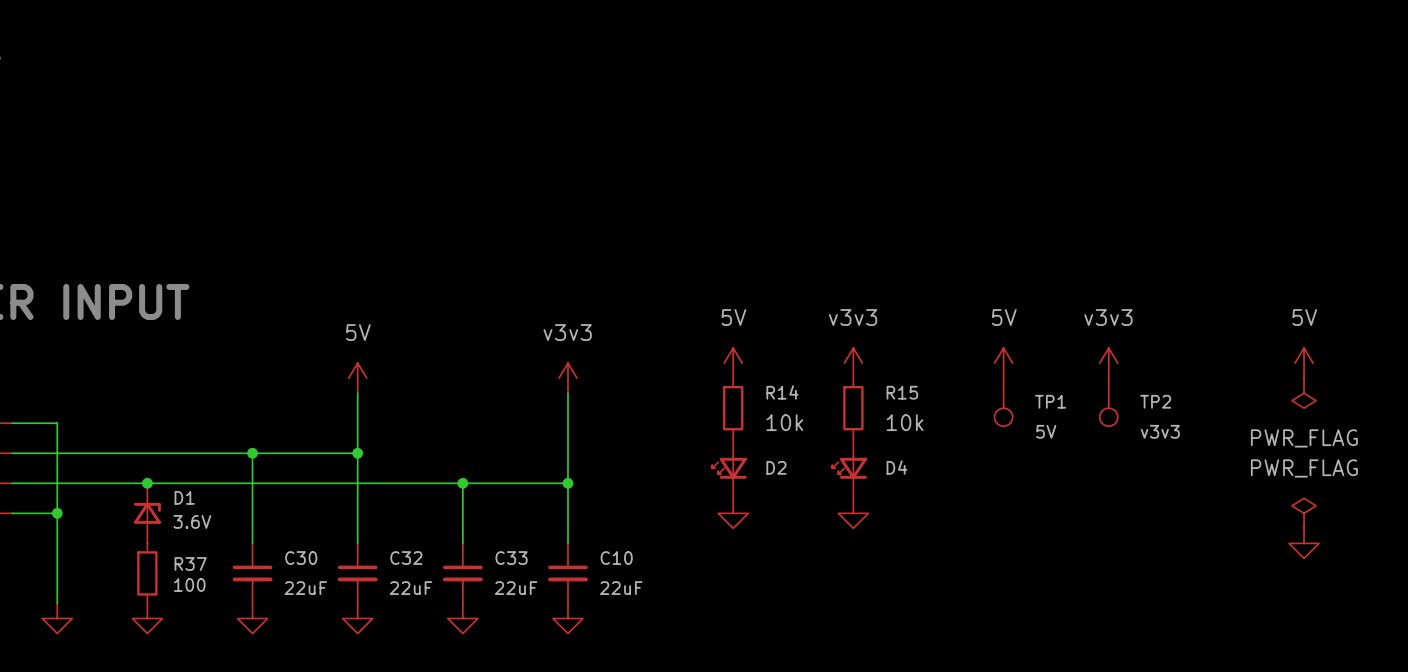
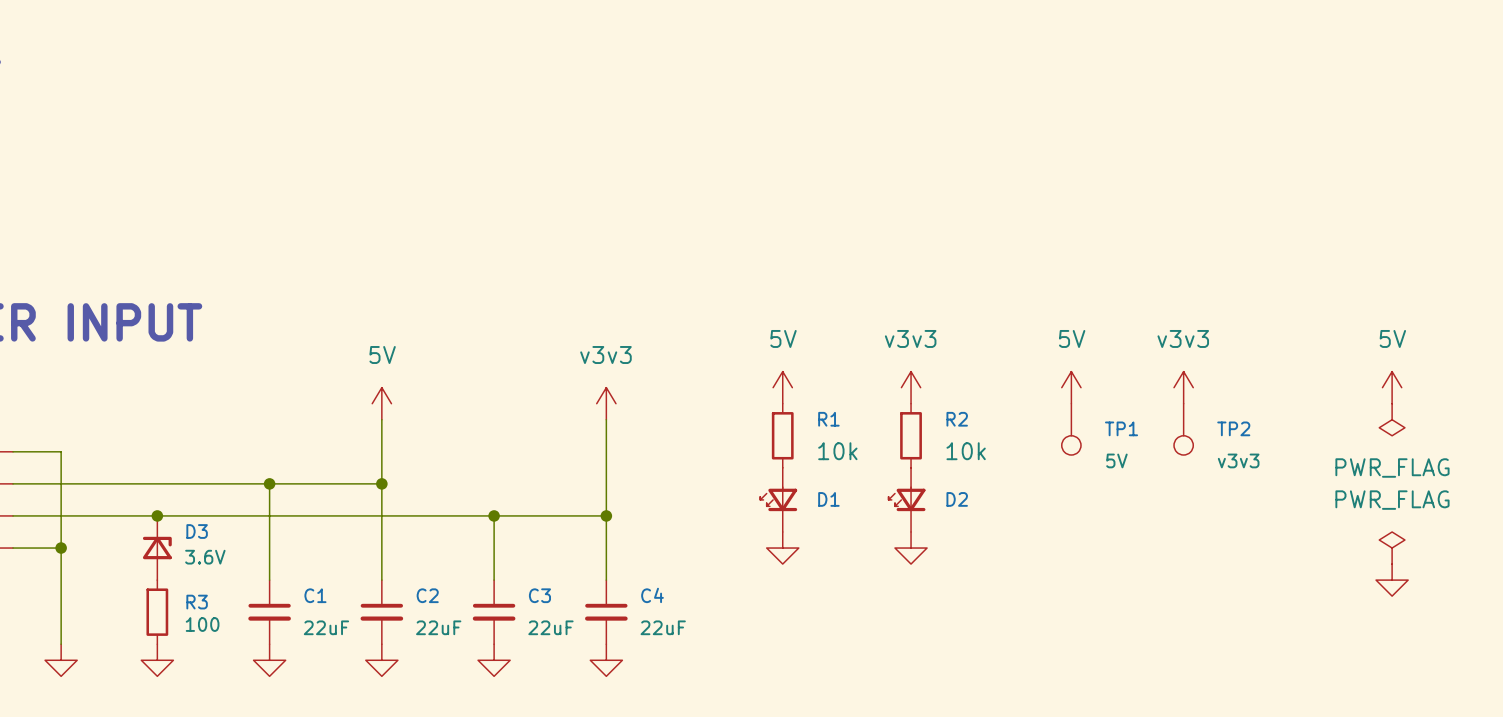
R14 name: R14 (782, 392) -> R1 (828, 419)
R15 name: R15 (902, 392) -> R2 (957, 419)
D2 name: D2 (776, 467) -> D1 (828, 499)
D4 name: D4 (896, 467) -> D2 (957, 499)
D1 name: D1 (184, 497) -> D3 (197, 531)
C30 name: C30 (301, 558) -> C1 (315, 595)
C32 name: C32 (406, 558) -> C2 (427, 595)
C33 name: C33 (511, 558) -> C3 (539, 595)
C10 name: C10 (616, 558) -> C4 (652, 595)
R37 name: R37 (190, 563) -> R3 (197, 602)

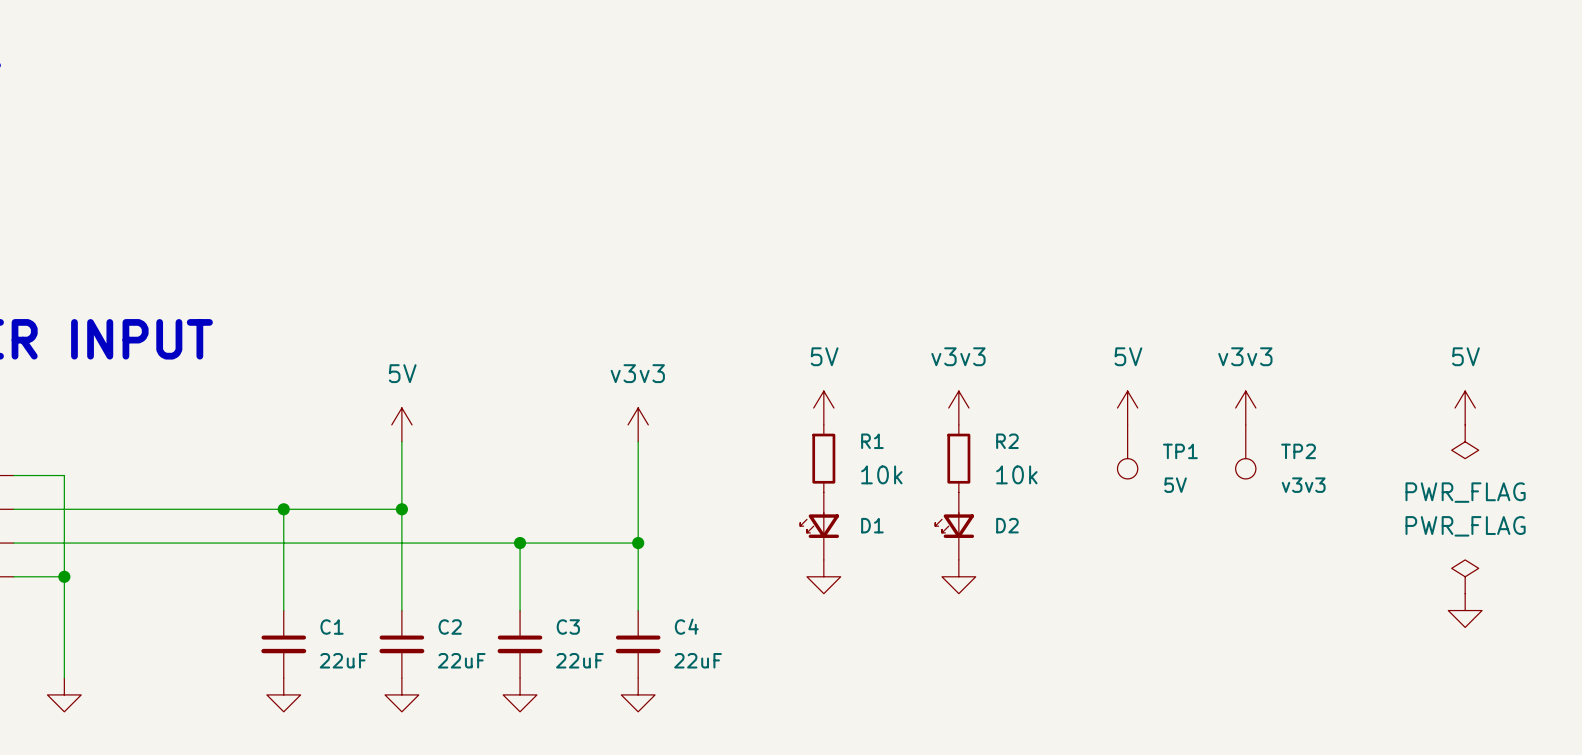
junction: (157, 515) -> none
D3: 3.6V (157, 548) -> none
R3: 100 (157, 612) -> none
power symbol: (157, 660) -> none

